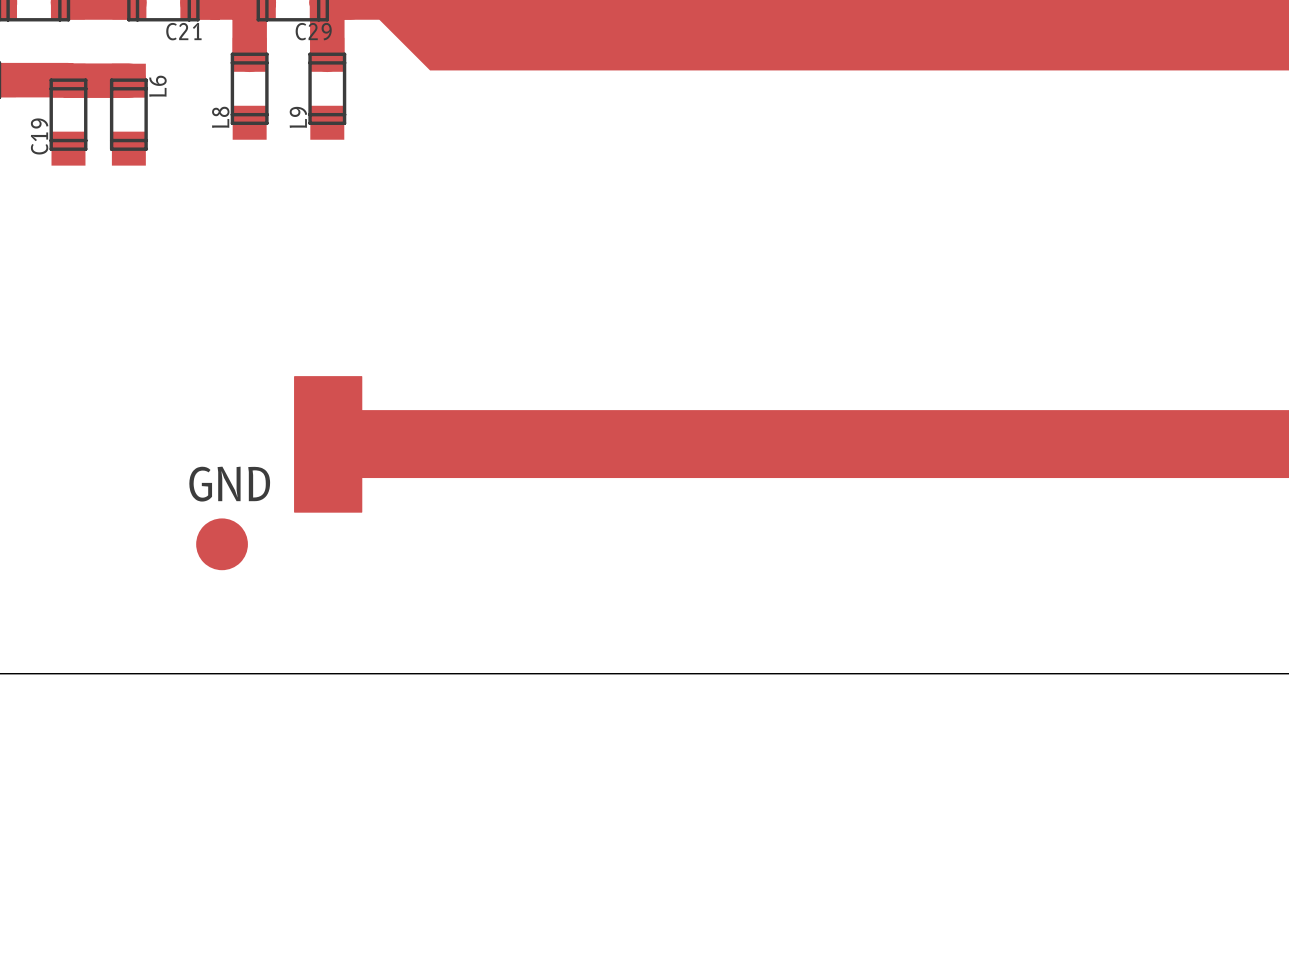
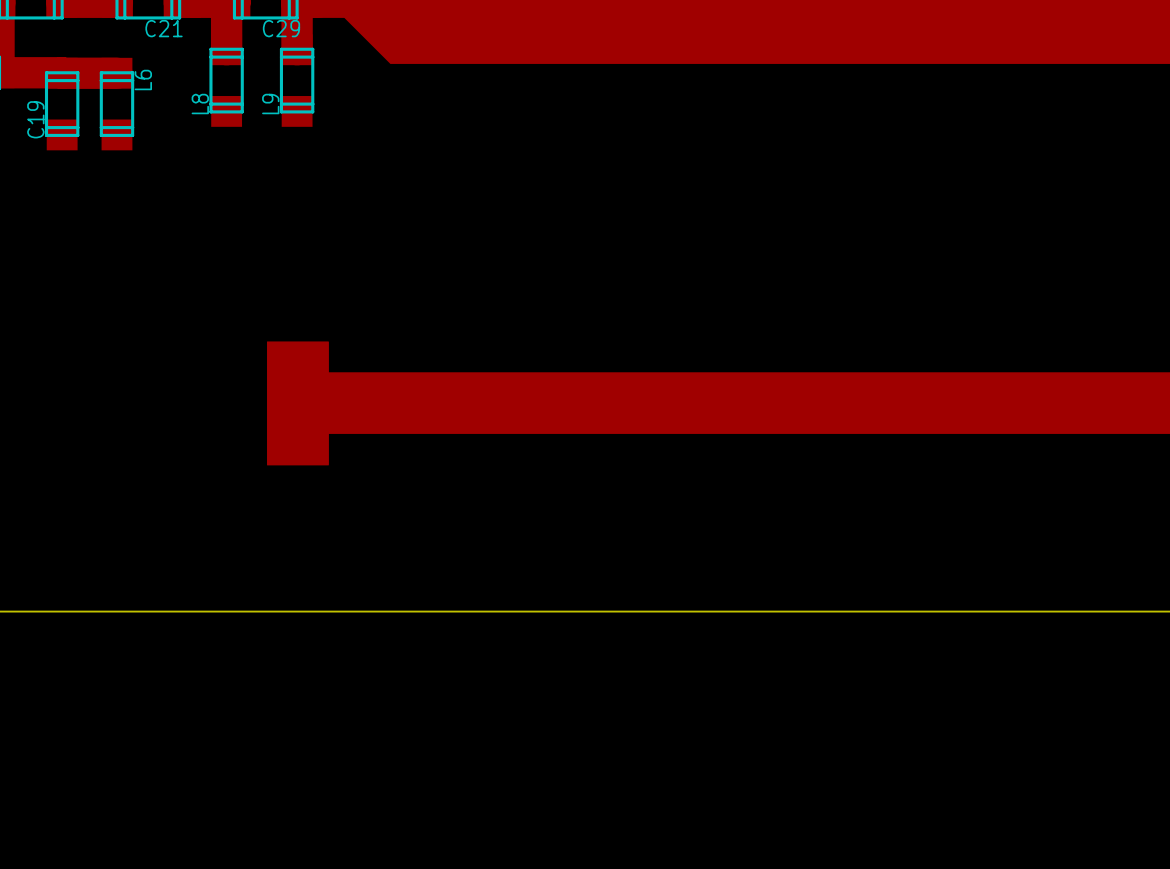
text: GND (229, 484) -> none
part: (222, 544) -> none

